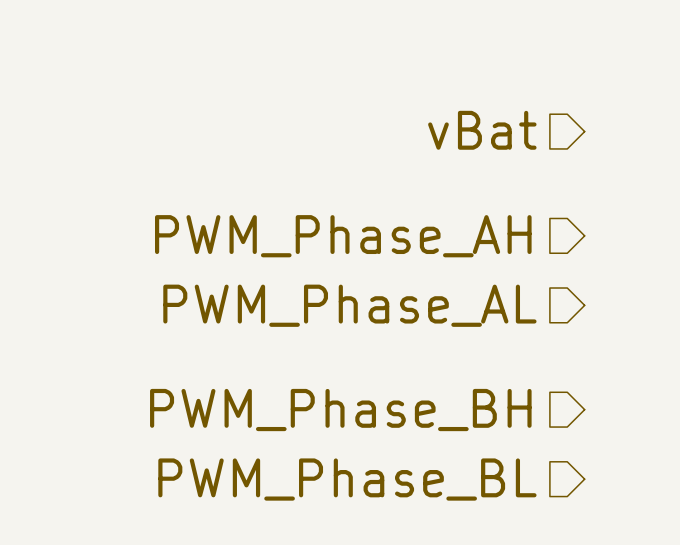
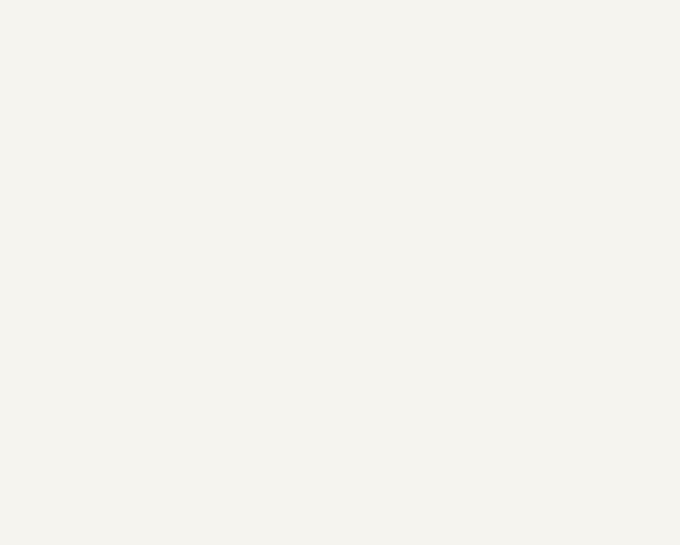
hierarchical label: vBat (482, 130) -> none
hierarchical label: PWM_Phase_AH (343, 236) -> none
hierarchical label: PWM_Phase_AL (349, 305) -> none
hierarchical label: PWM_Phase_BH (340, 410) -> none
hierarchical label: PWM_Phase_BL (347, 479) -> none

